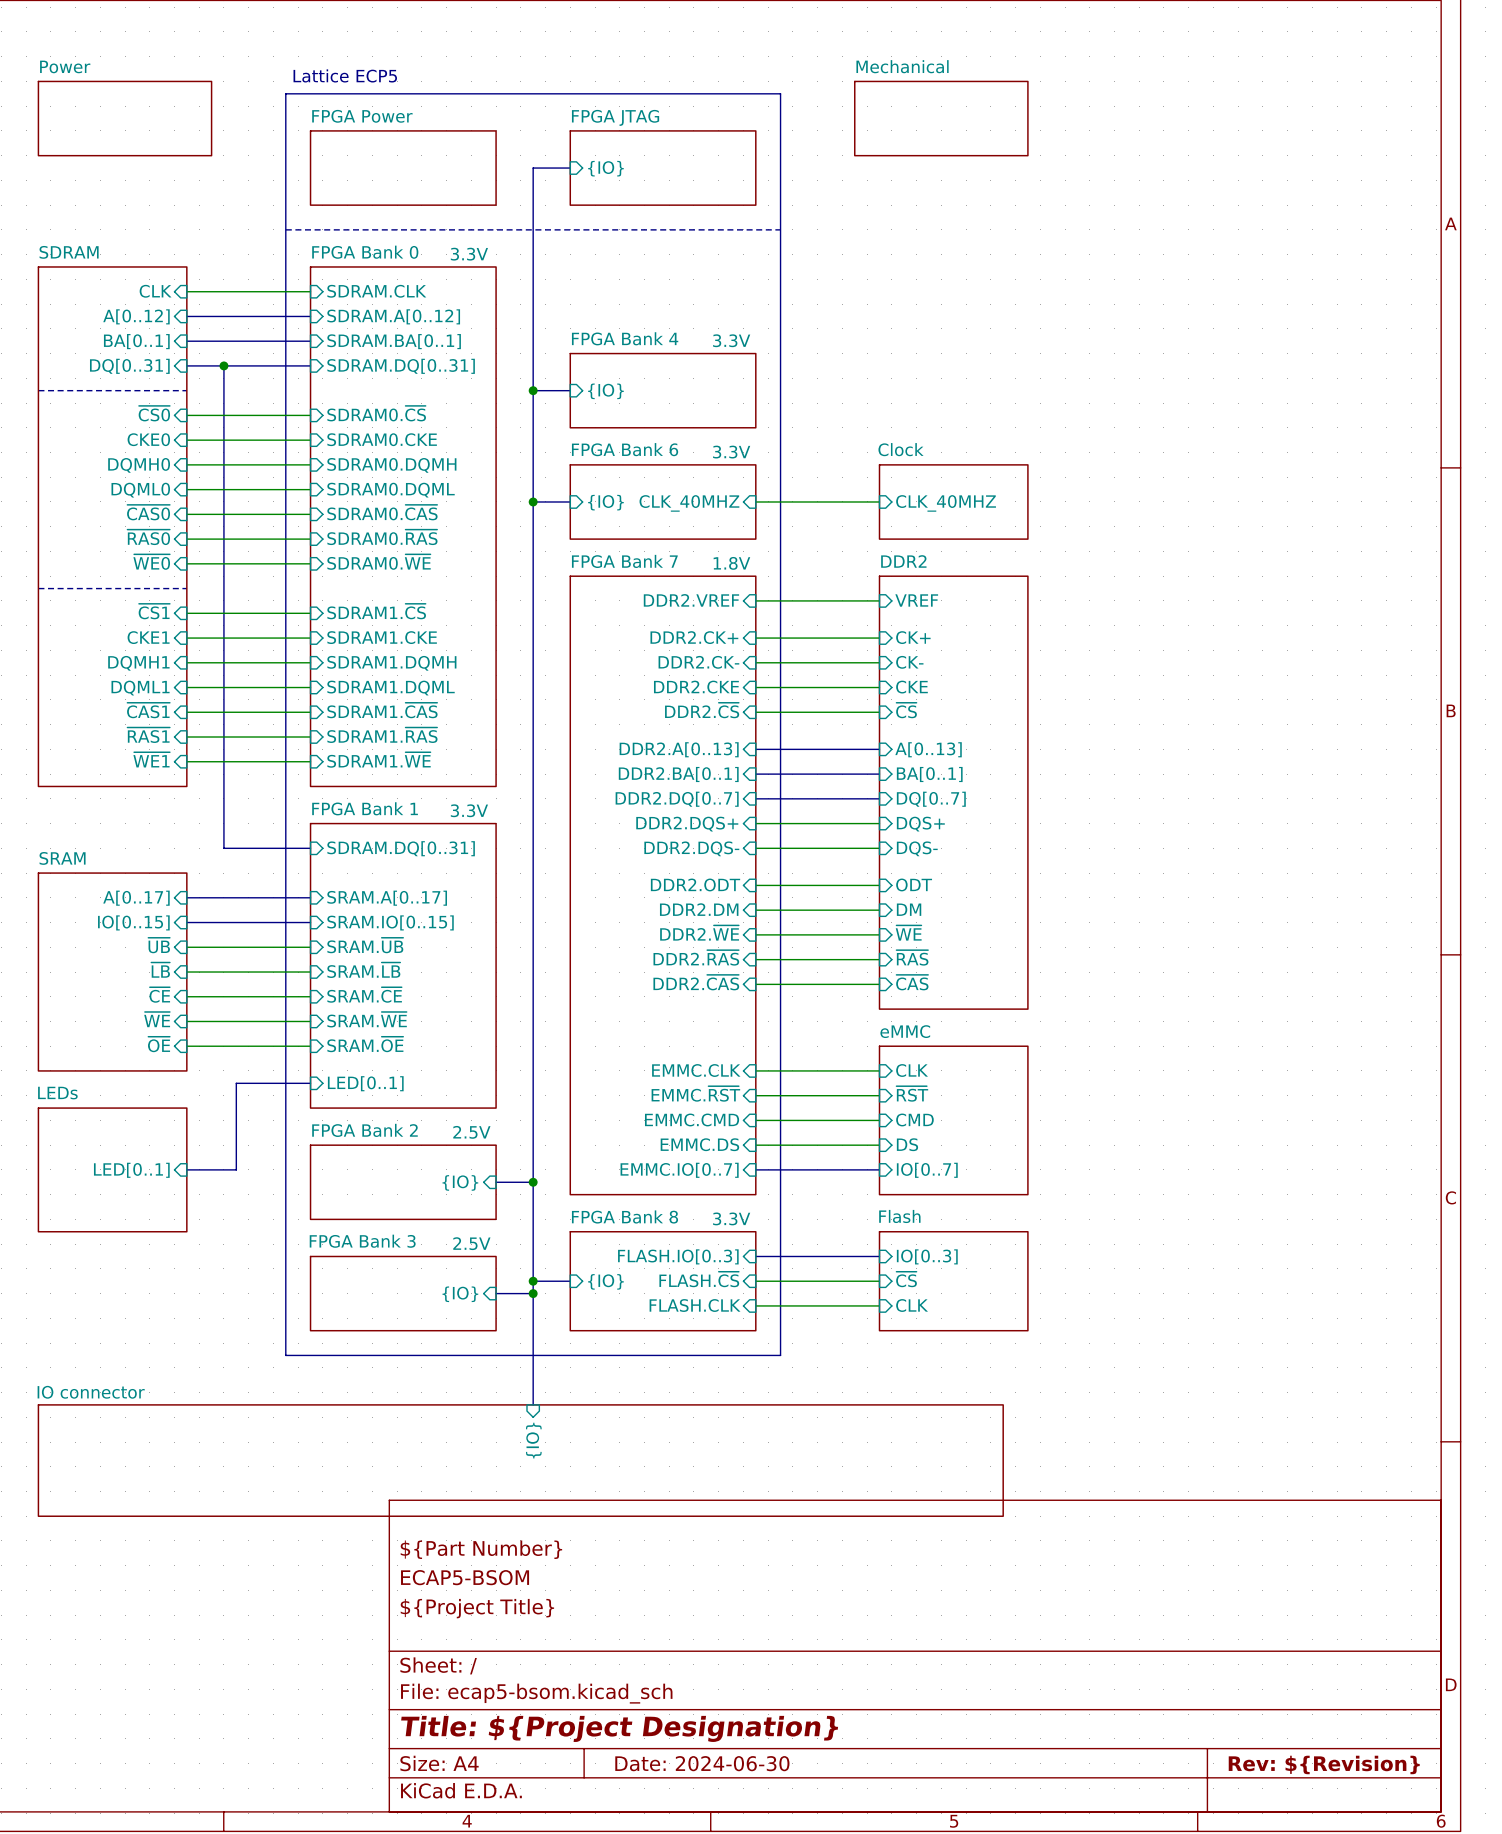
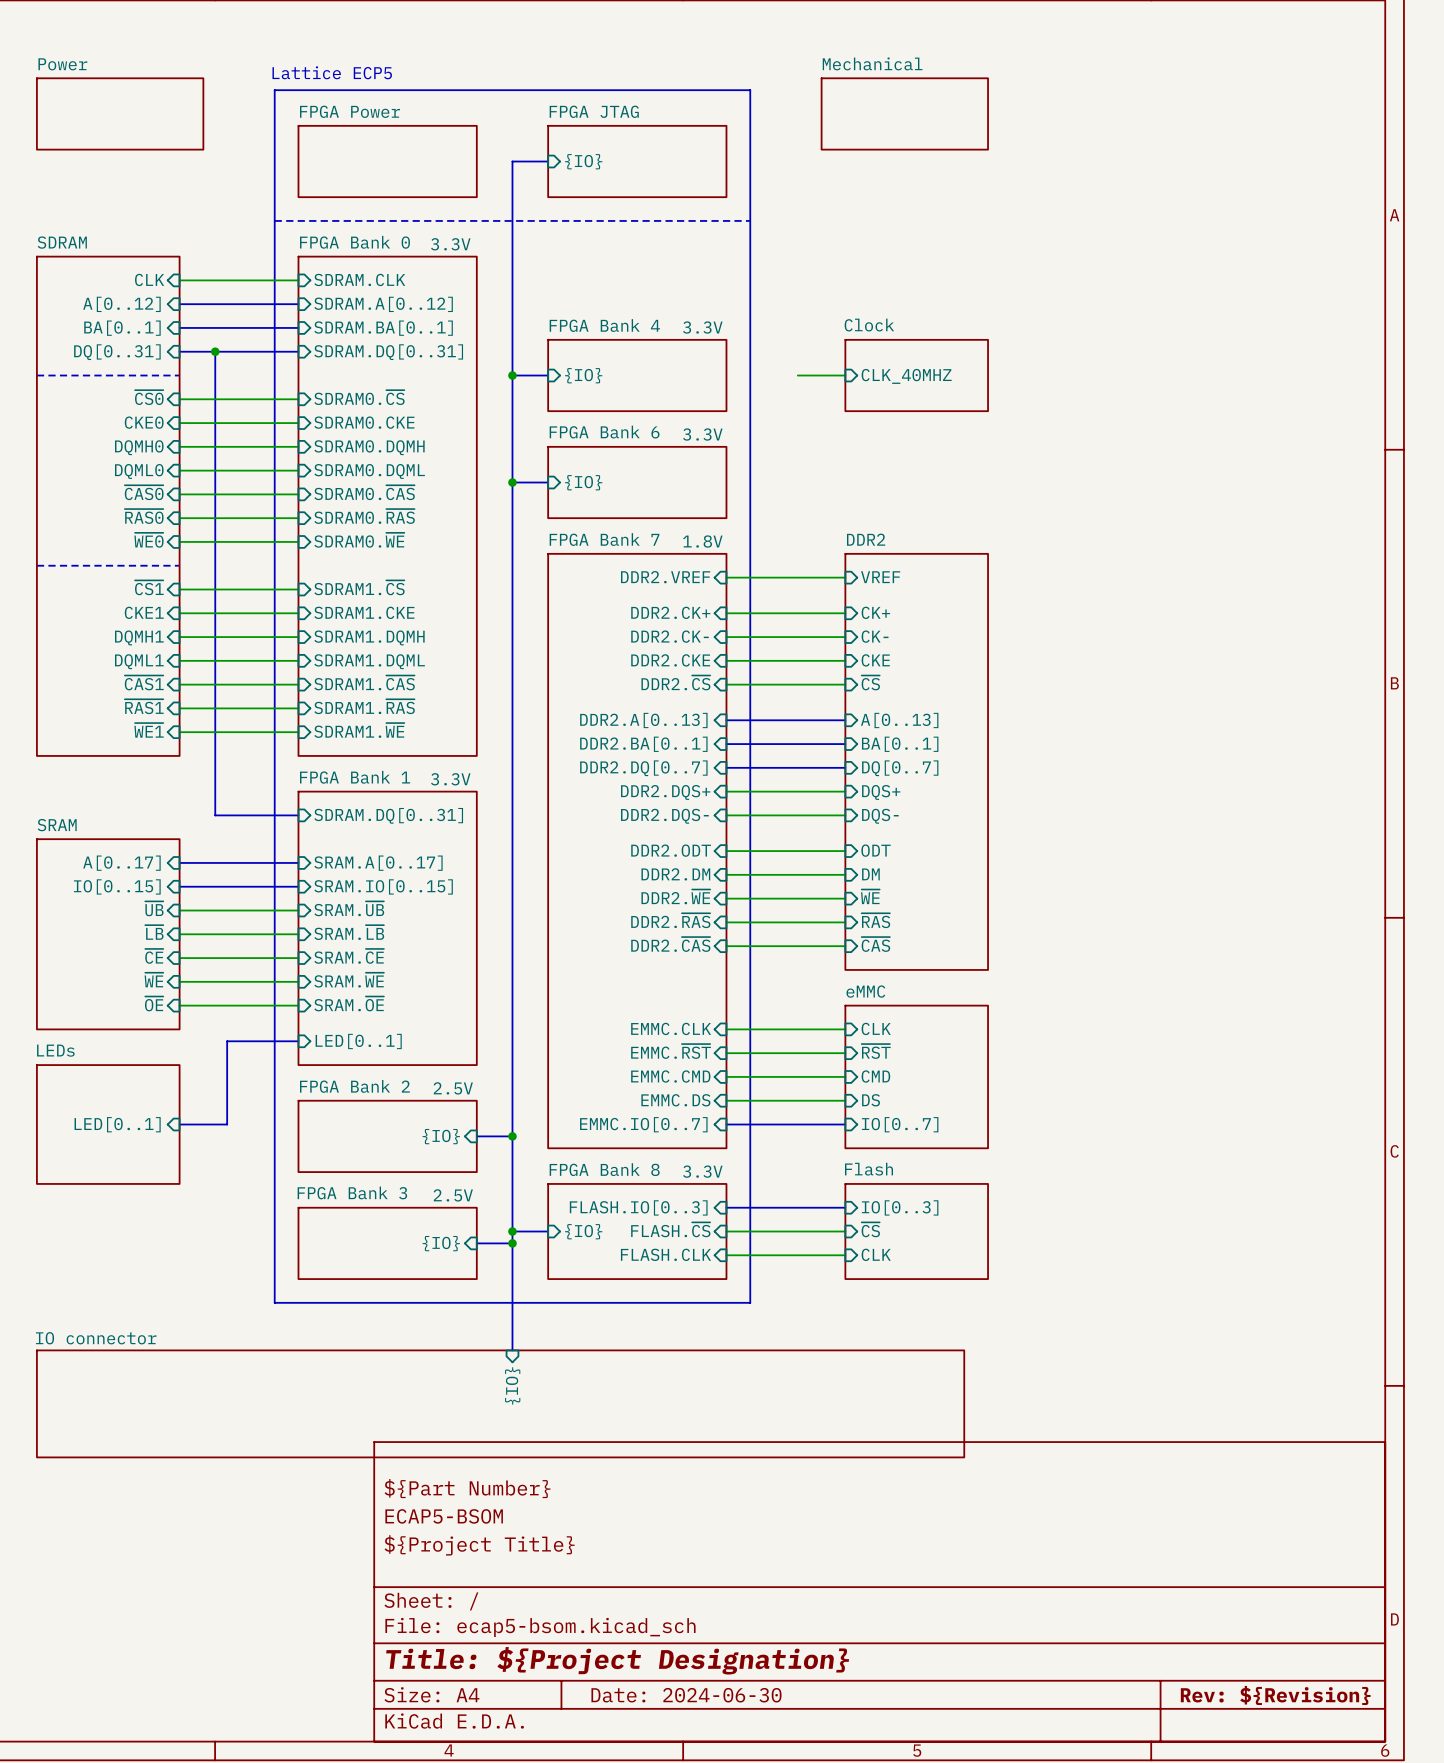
wire: none -> (797, 375) (845, 375)
sheet pin: none -> CLK_40MHZ (906, 376)
wire: (755, 501) (879, 501) -> none
sheet Clock position: (953, 501) -> (916, 375)
sheet pin: CLK_40MHZ (689, 503) -> none
sheet pin: CLK_40MHZ (946, 503) -> none

